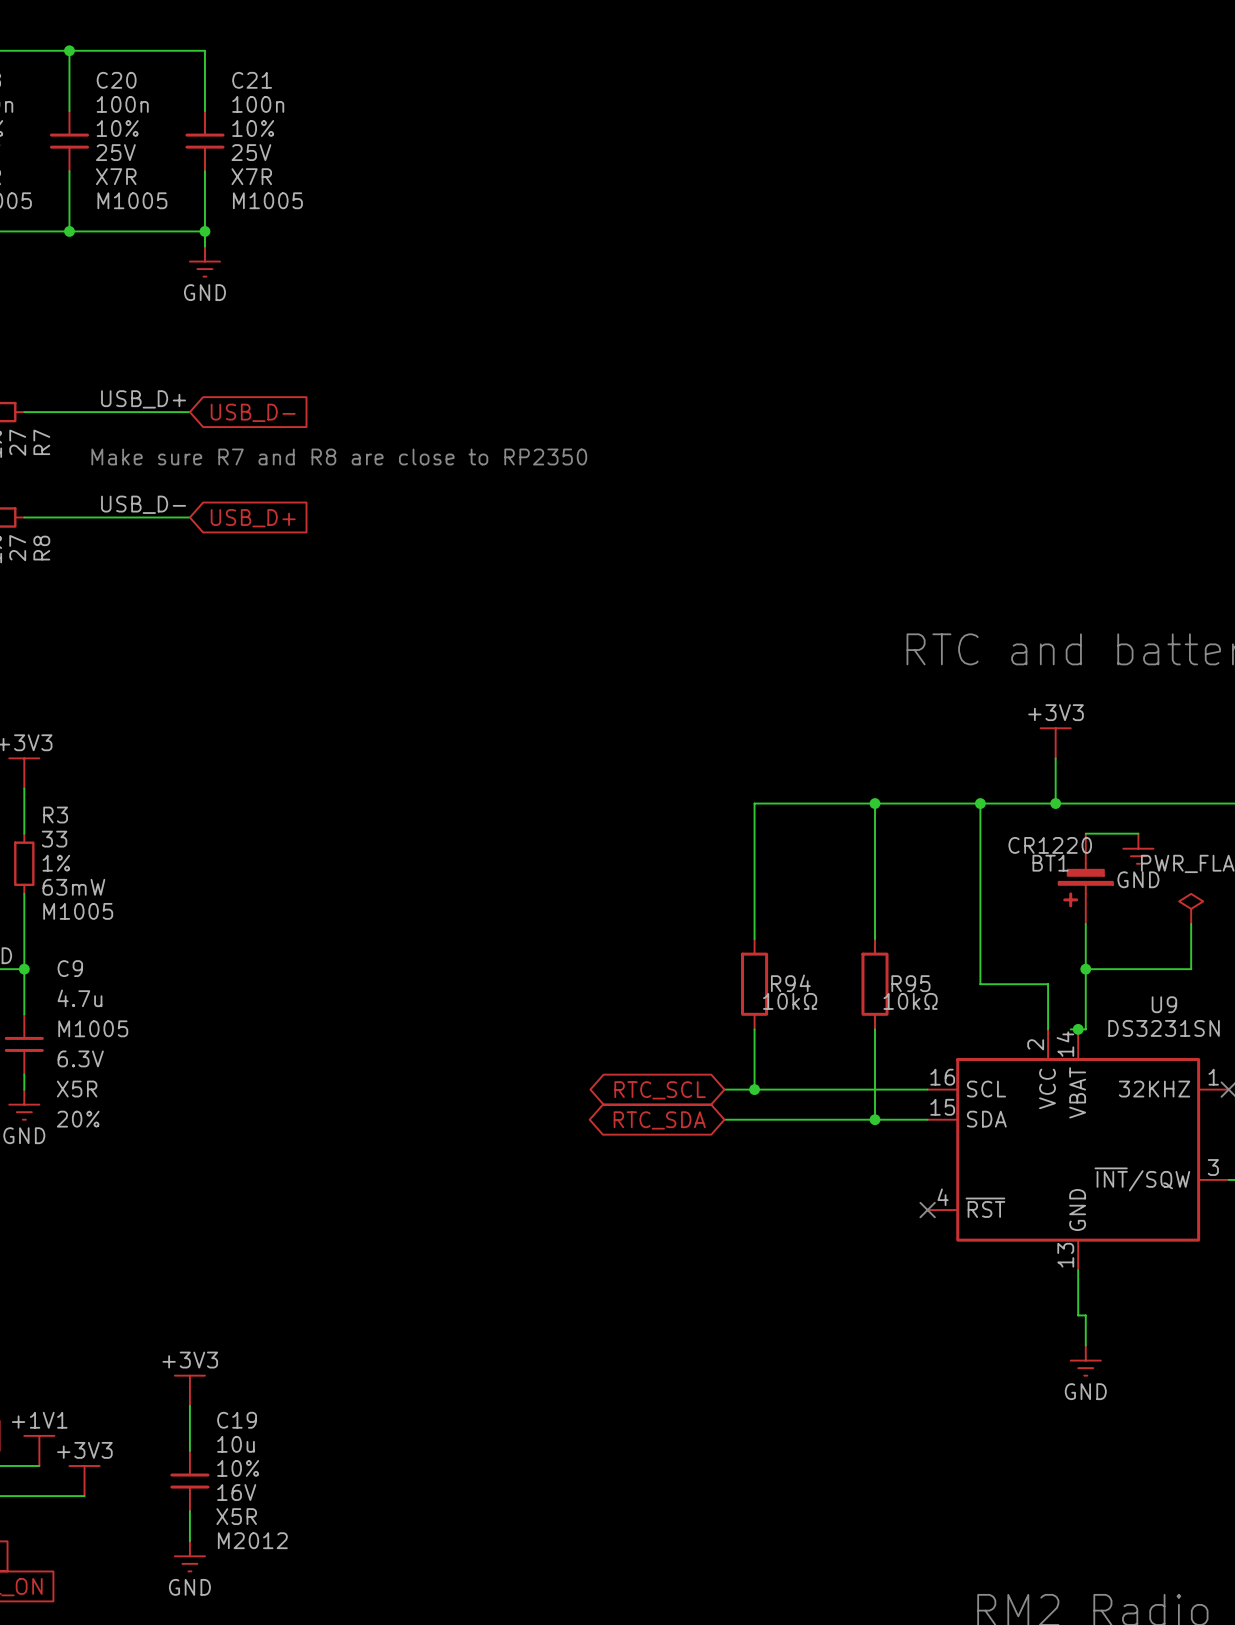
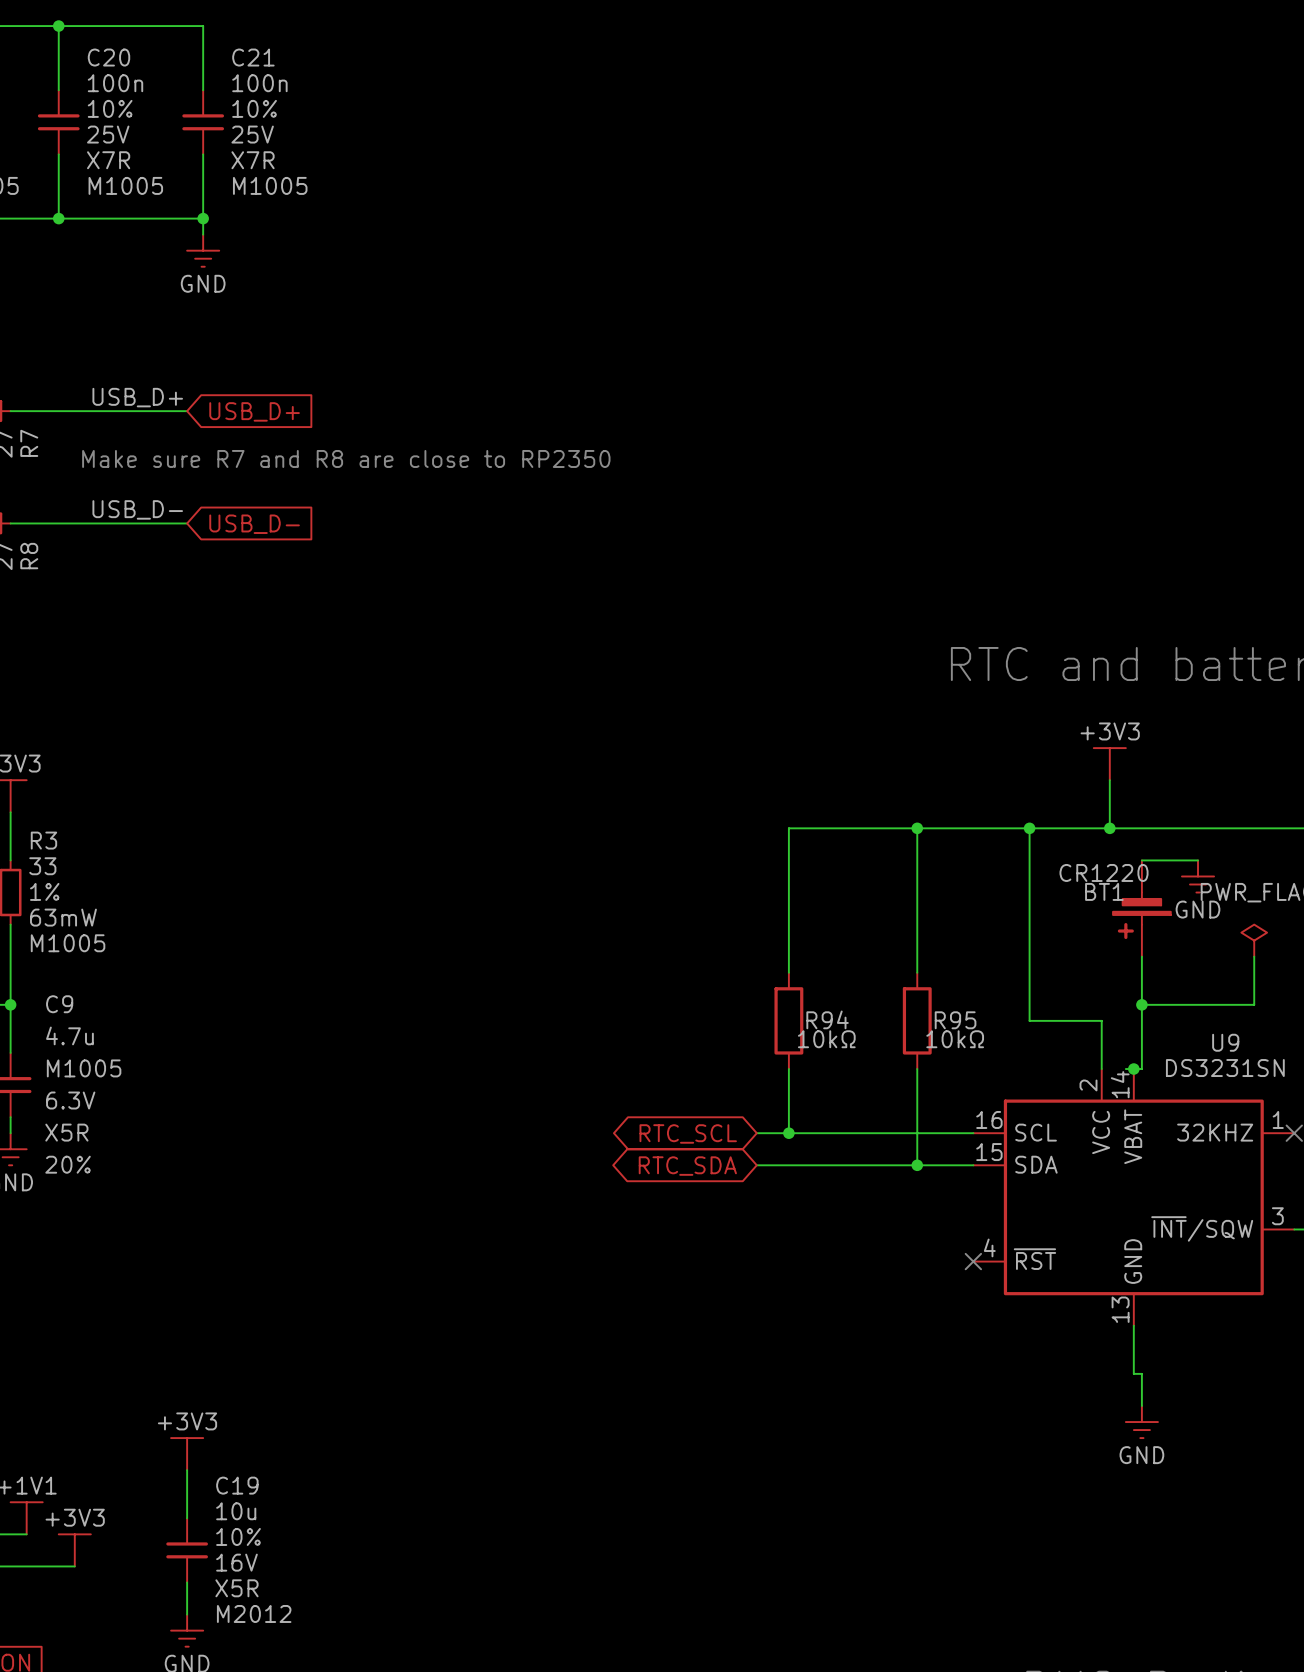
global label: USB_D- (253, 412) -> USB_D+ (254, 411)
global label: USB_D+ (253, 518) -> USB_D- (254, 524)

